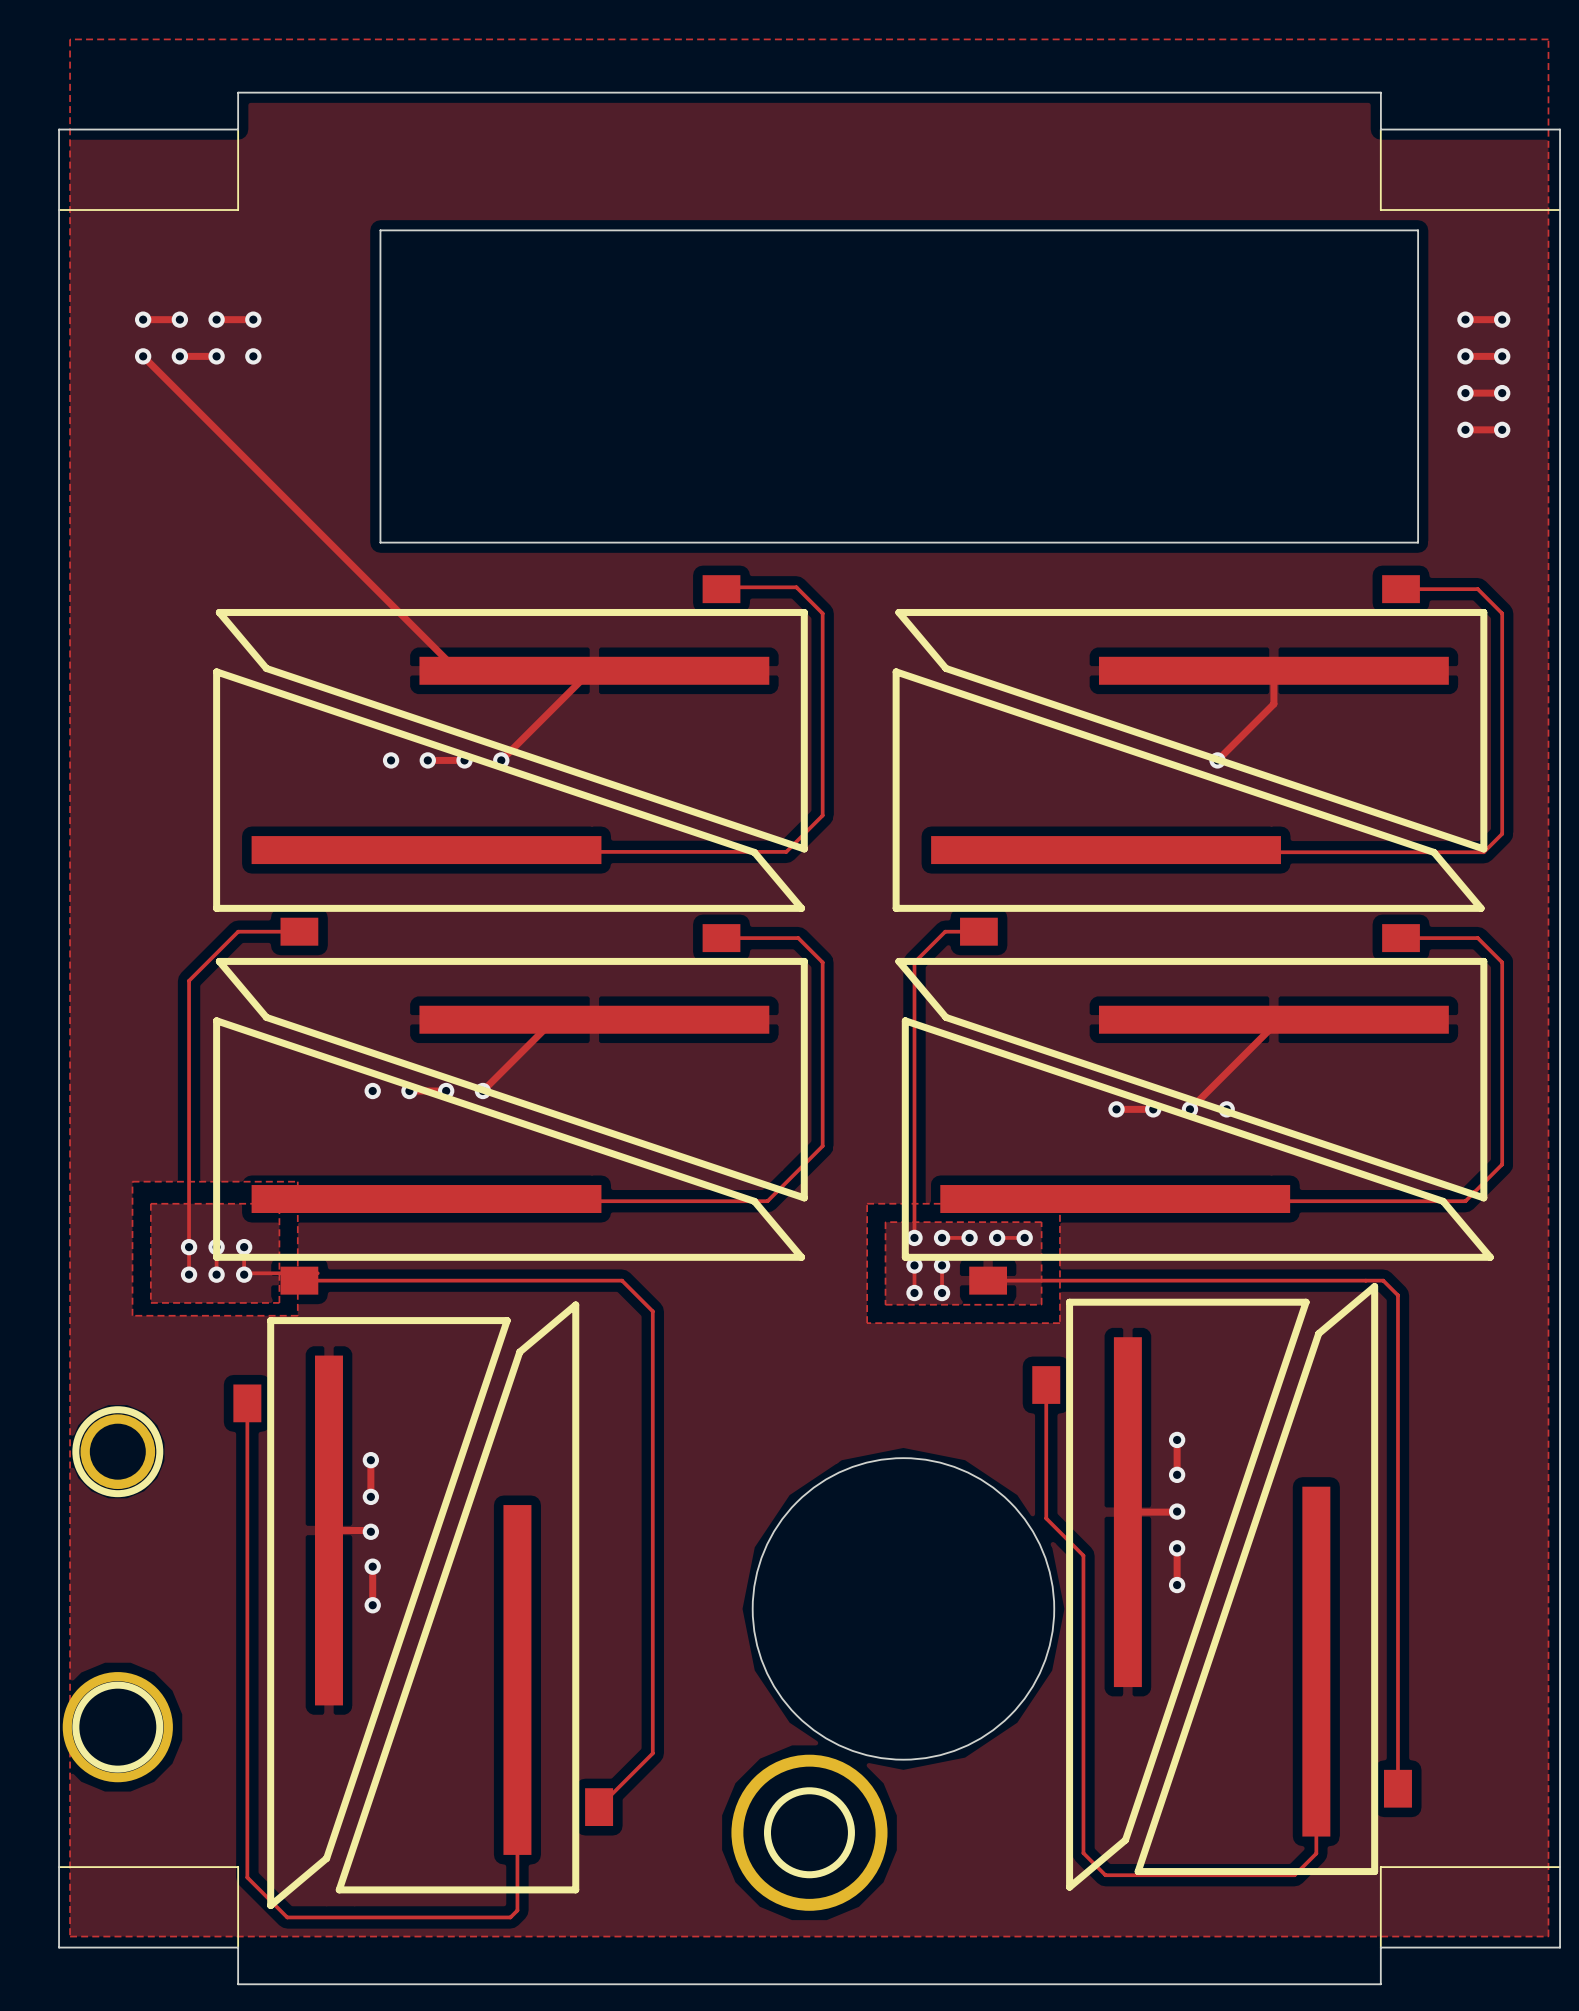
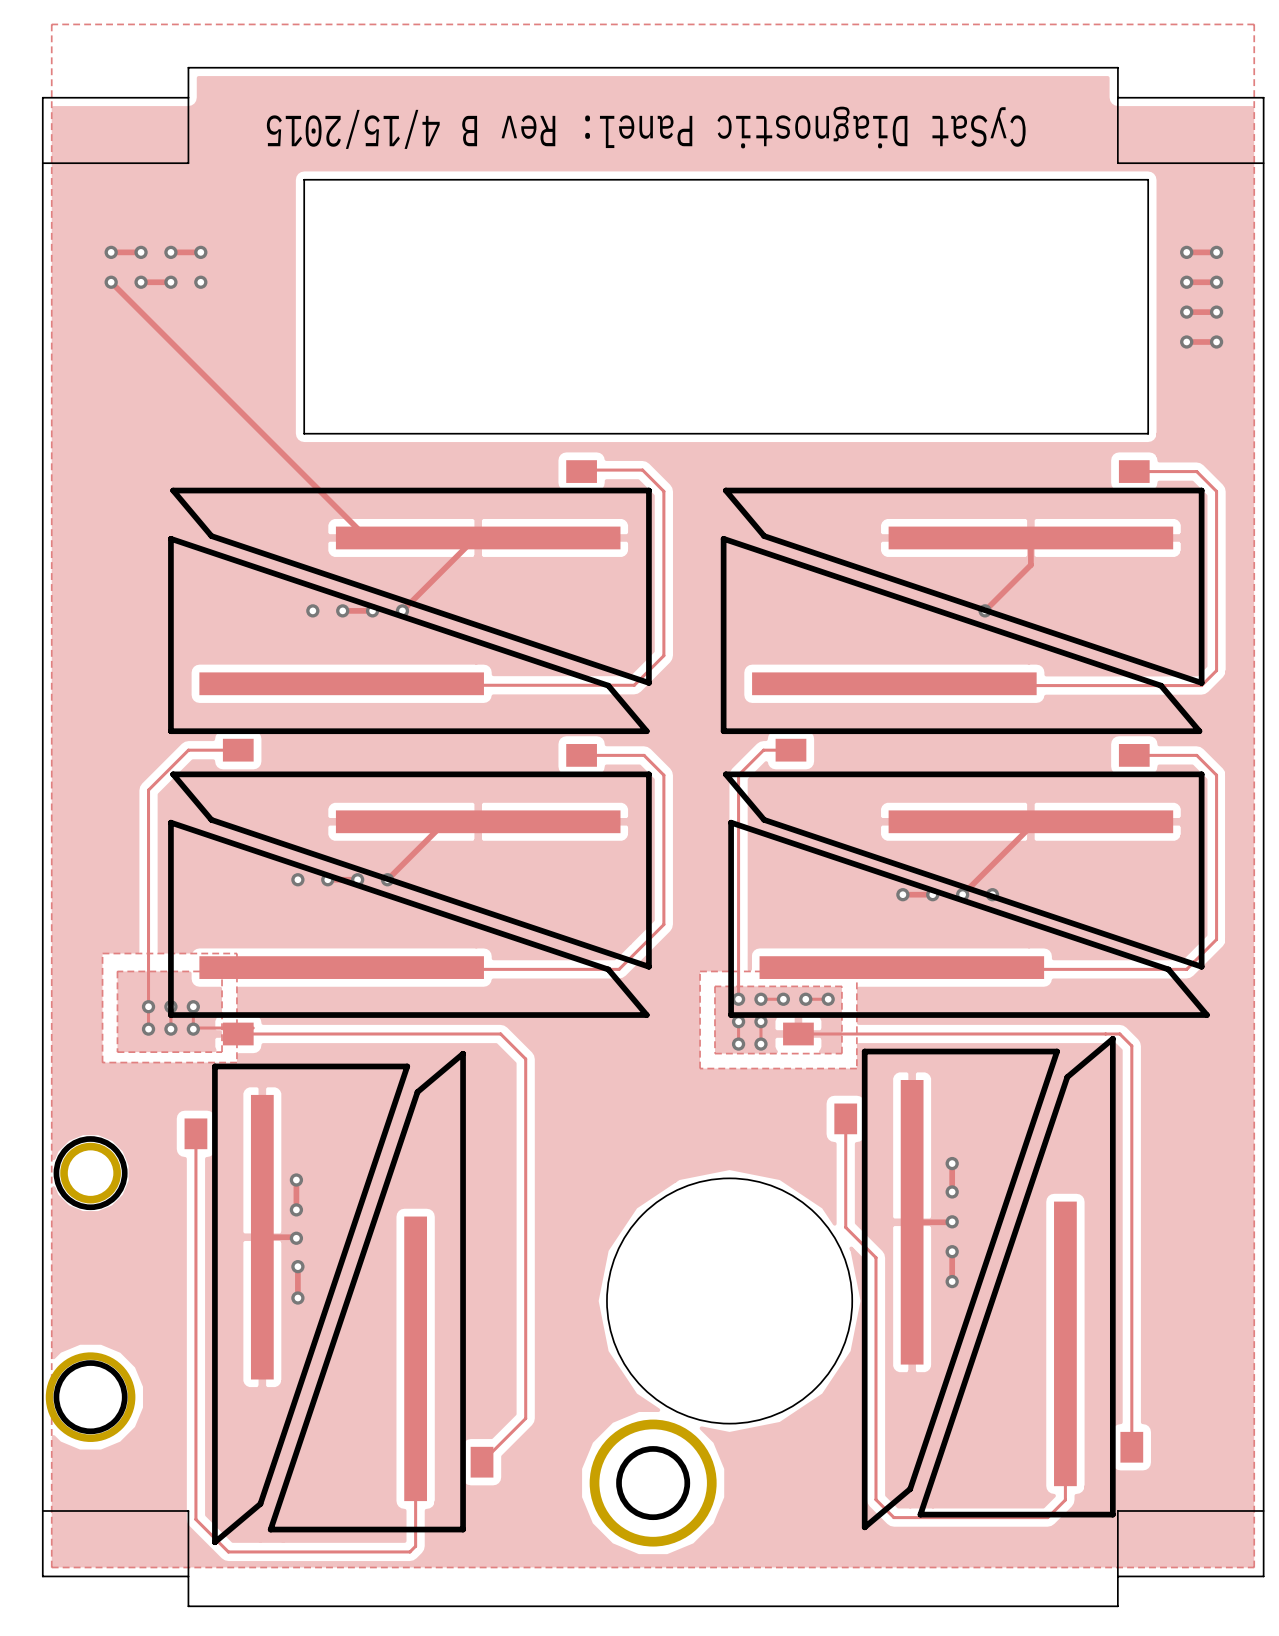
text: none -> CySat Diagnostic Panel: Rev B 4/15/2015 (646, 127)

